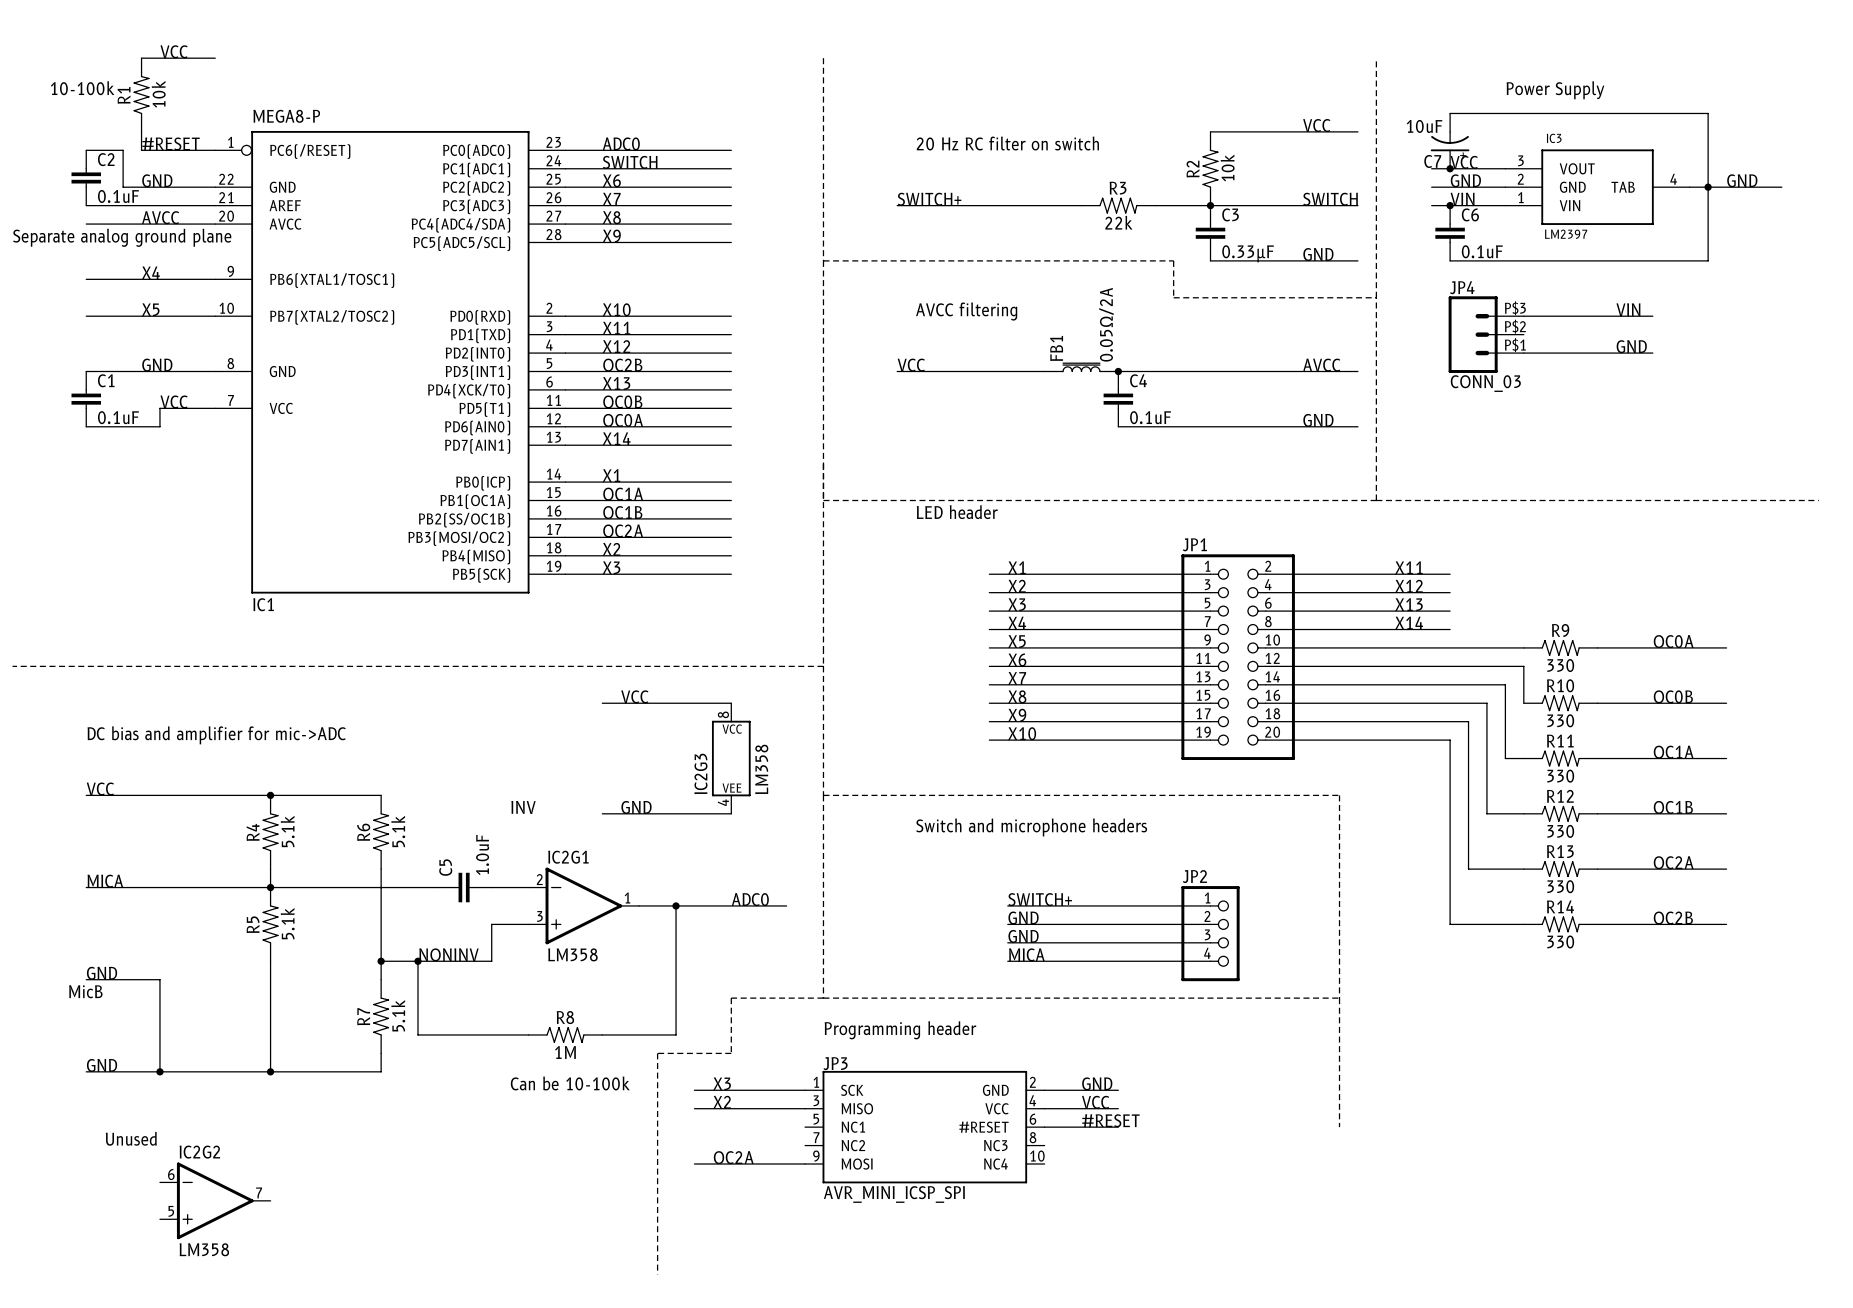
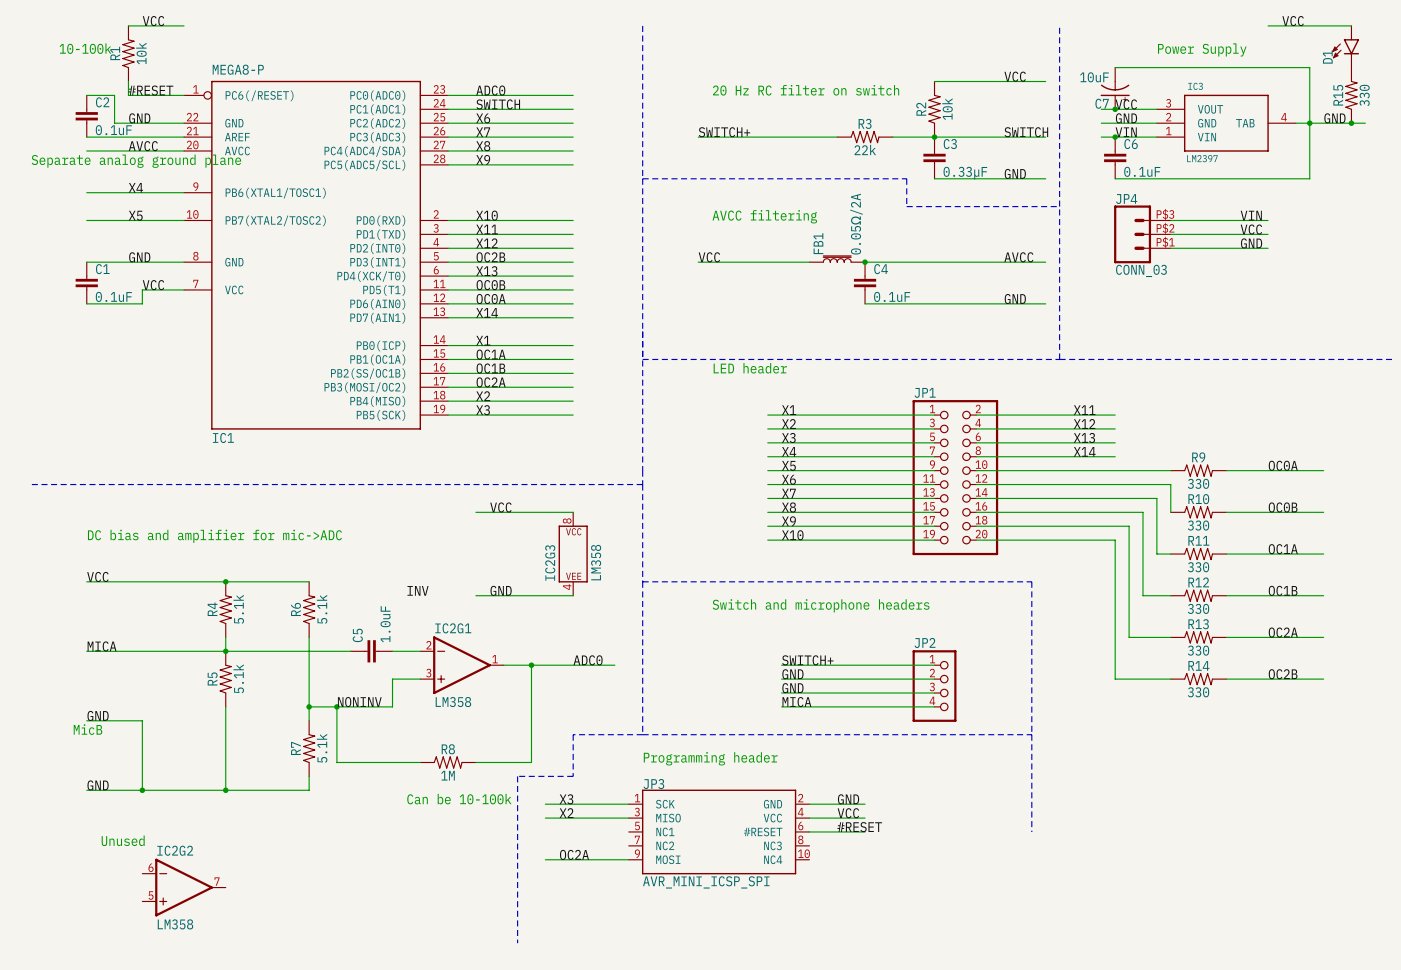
label: none -> VCC (1293, 21)
wire: none -> (1268, 25) (1351, 25)
D1: none -> (1345, 46)
R15: none -> 330 (1351, 95)
junction: none -> (1351, 123)
label: none -> VCC (1251, 229)
wire: none -> (1170, 234) (1268, 234)

